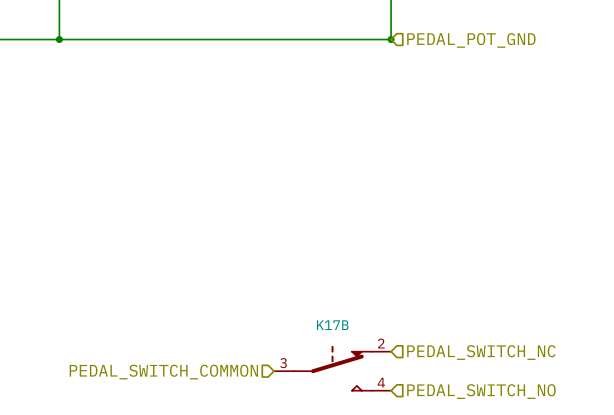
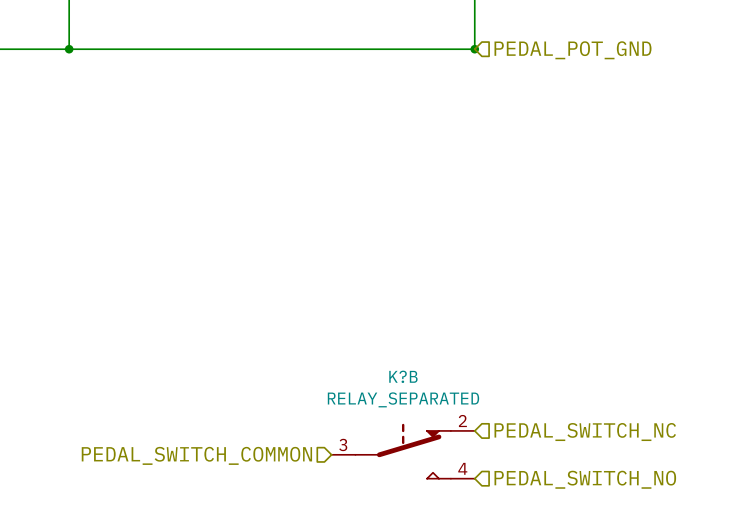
K17B name: K17B (332, 325) -> K?B (403, 376)
K17B value: none -> RELAY_SEPARATED (403, 399)

